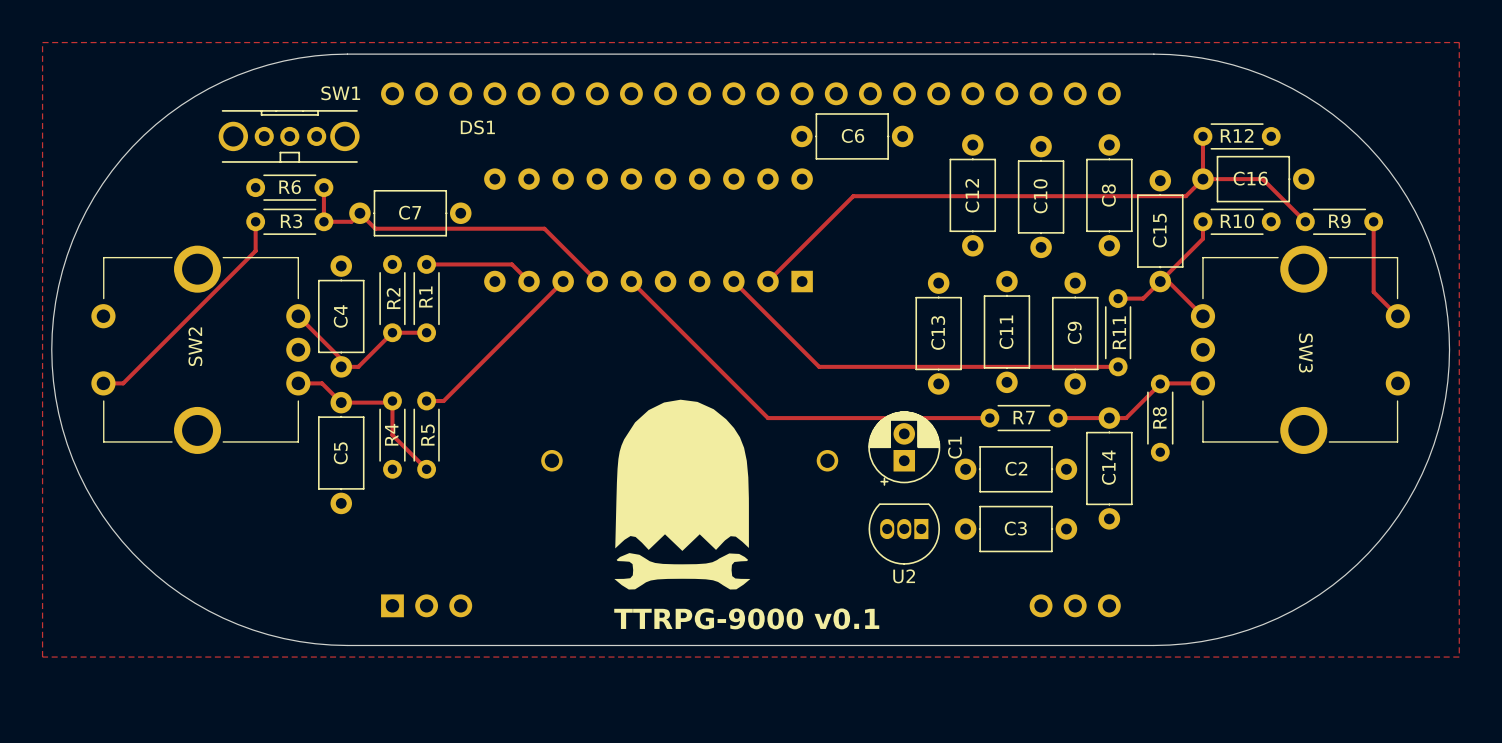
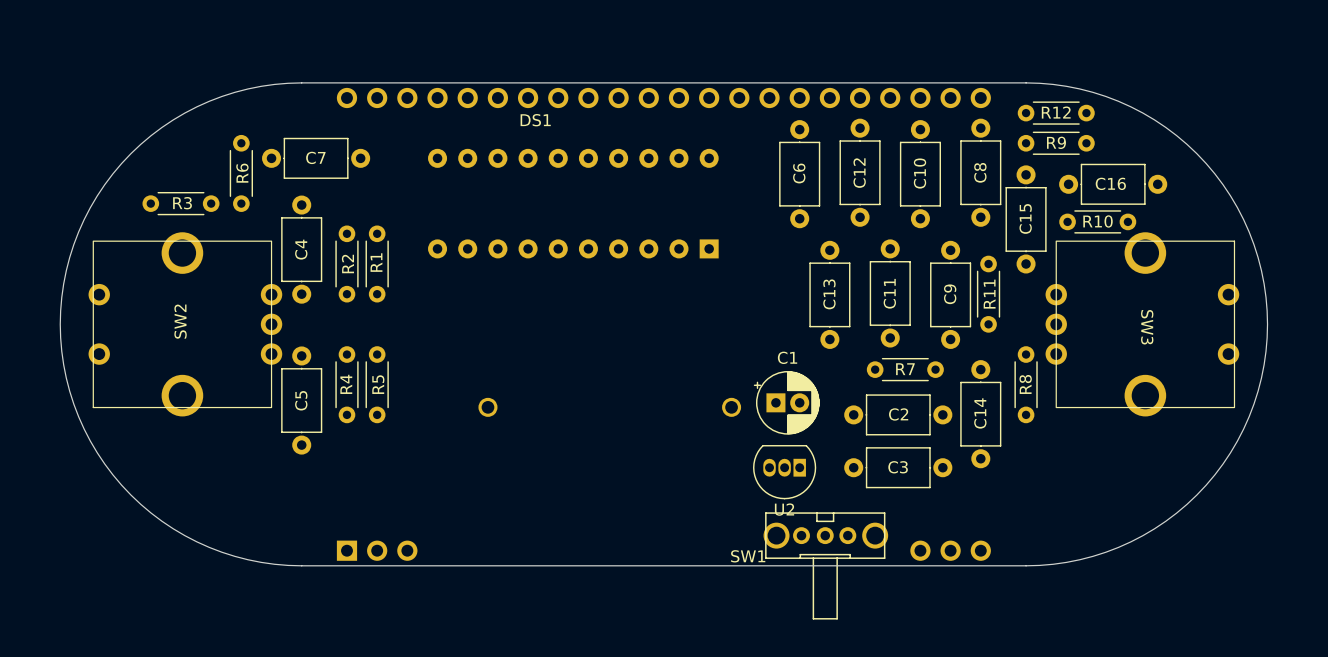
zone outline: (42, 42) (1459, 42) (1459, 657) (42, 657) (42, 42) -> none
board edge: (347, 54) (1153, 54) (1201, 58) (1248, 69) (1278, 81) (1306, 96) (1332, 114) (1357, 135) (1389, 170) (1407, 197) (1422, 225) (1434, 255) (1442, 286) (1449, 333) (1449, 365) (1445, 397) (1434, 444) (1422, 473) (1398, 515) (1368, 553) (1345, 575) (1319, 594) (1278, 618) (1248, 630) (1201, 641) (1153, 645) (347, 645) (299, 641) (253, 630) (208, 611) (168, 585) (144, 564) (122, 541) (94, 502) (72, 459) (58, 413) (53, 381) (51, 349) (55, 301) (67, 255) (79, 225) (94, 197) (122, 158) (156, 124) (181, 105) (208, 88) (253, 69) (299, 58) (347, 54) -> (301, 82) (261, 86) (221, 96) (184, 113) (151, 135) (130, 153) (112, 173) (90, 207) (73, 244) (63, 283) (60, 310) (60, 337) (66, 378) (78, 416) (97, 452) (121, 485) (151, 513) (184, 535) (221, 552) (261, 562) (301, 565) (1026, 565) (1066, 562) (1092, 556) (1118, 547) (1142, 535) (1176, 513) (1206, 485) (1222, 464) (1237, 441) (1253, 404) (1261, 378) (1266, 351) (1267, 310) (1264, 283) (1258, 257) (1243, 219) (1222, 184) (1206, 163) (1186, 144) (1165, 127) (1142, 113) (1105, 96) (1066, 86) (1026, 82) (301, 82)
SW1 name position: SW1 (340, 93) -> SW1 (748, 556)
SW1 footprint: [218, 110, 360, 163] -> [763, 512, 889, 620]
DS1 name position: DS1 (477, 127) -> DS1 (535, 120)
C6 rotation: 0° (852, 136) -> 90° clockwise (799, 174)
C6 position: (852, 136) -> (799, 174)
track: (1202, 136) (1202, 179) -> none
R12 position: (1237, 136) -> (1056, 113)
track: (1202, 179) (1262, 179) (1305, 221) -> none
track: (1202, 179) (1185, 196) (853, 196) (767, 281) -> none
C16 position: (1253, 179) -> (1113, 184)
R6 rotation: 0° (289, 187) -> 90° clockwise (241, 173)
track: (323, 187) (323, 221) (351, 221) (359, 213) (375, 228) (544, 228) (597, 281) -> none
C7 position: (410, 213) -> (316, 158)
track: (255, 221) (255, 250) (123, 383) (103, 383) -> none
R3 position: (289, 221) -> (180, 203)
track: (1202, 221) (1202, 238) (1143, 298) (1118, 298) -> none
R10 position: (1237, 221) -> (1097, 221)
R9 position: (1339, 221) -> (1056, 143)
track: (1373, 221) (1373, 292) (1397, 316) -> none
C15 position: (1160, 231) -> (1026, 219)
SW2 footprint: [91, 245, 311, 454] -> [88, 232, 283, 417]
SW3 footprint: [1190, 245, 1410, 454] -> [1045, 232, 1240, 417]
track: (426, 264) (511, 264) (529, 281) -> none
track: (563, 281) (443, 401) (426, 401) -> none
track: (631, 281) (767, 418) (989, 418) -> none
track: (733, 281) (819, 366) (1118, 366) -> none
track: (1160, 281) (1168, 281) (1202, 316) -> none
track: (298, 316) (341, 359) (341, 366) (358, 366) (392, 332) (426, 332) -> none
C4 position: (341, 316) -> (301, 249)
DS1 position: (750, 349) -> (663, 324)
track: (298, 383) (322, 383) (341, 402) (390, 402) (392, 401) (392, 435) (426, 469) -> none
track: (1202, 383) (1160, 383) (1126, 418) (1058, 418) -> none
R8 position: (1160, 418) -> (1026, 384)
C1 name position: C1 (954, 447) -> C1 (787, 357)
C1 rotation: 0° (904, 448) -> 90° clockwise (786, 402)
part: (682, 494) -> none
U2 position: (904, 534) -> (784, 472)
text: TTRPG-9000 v0.1 (746, 618) -> none

